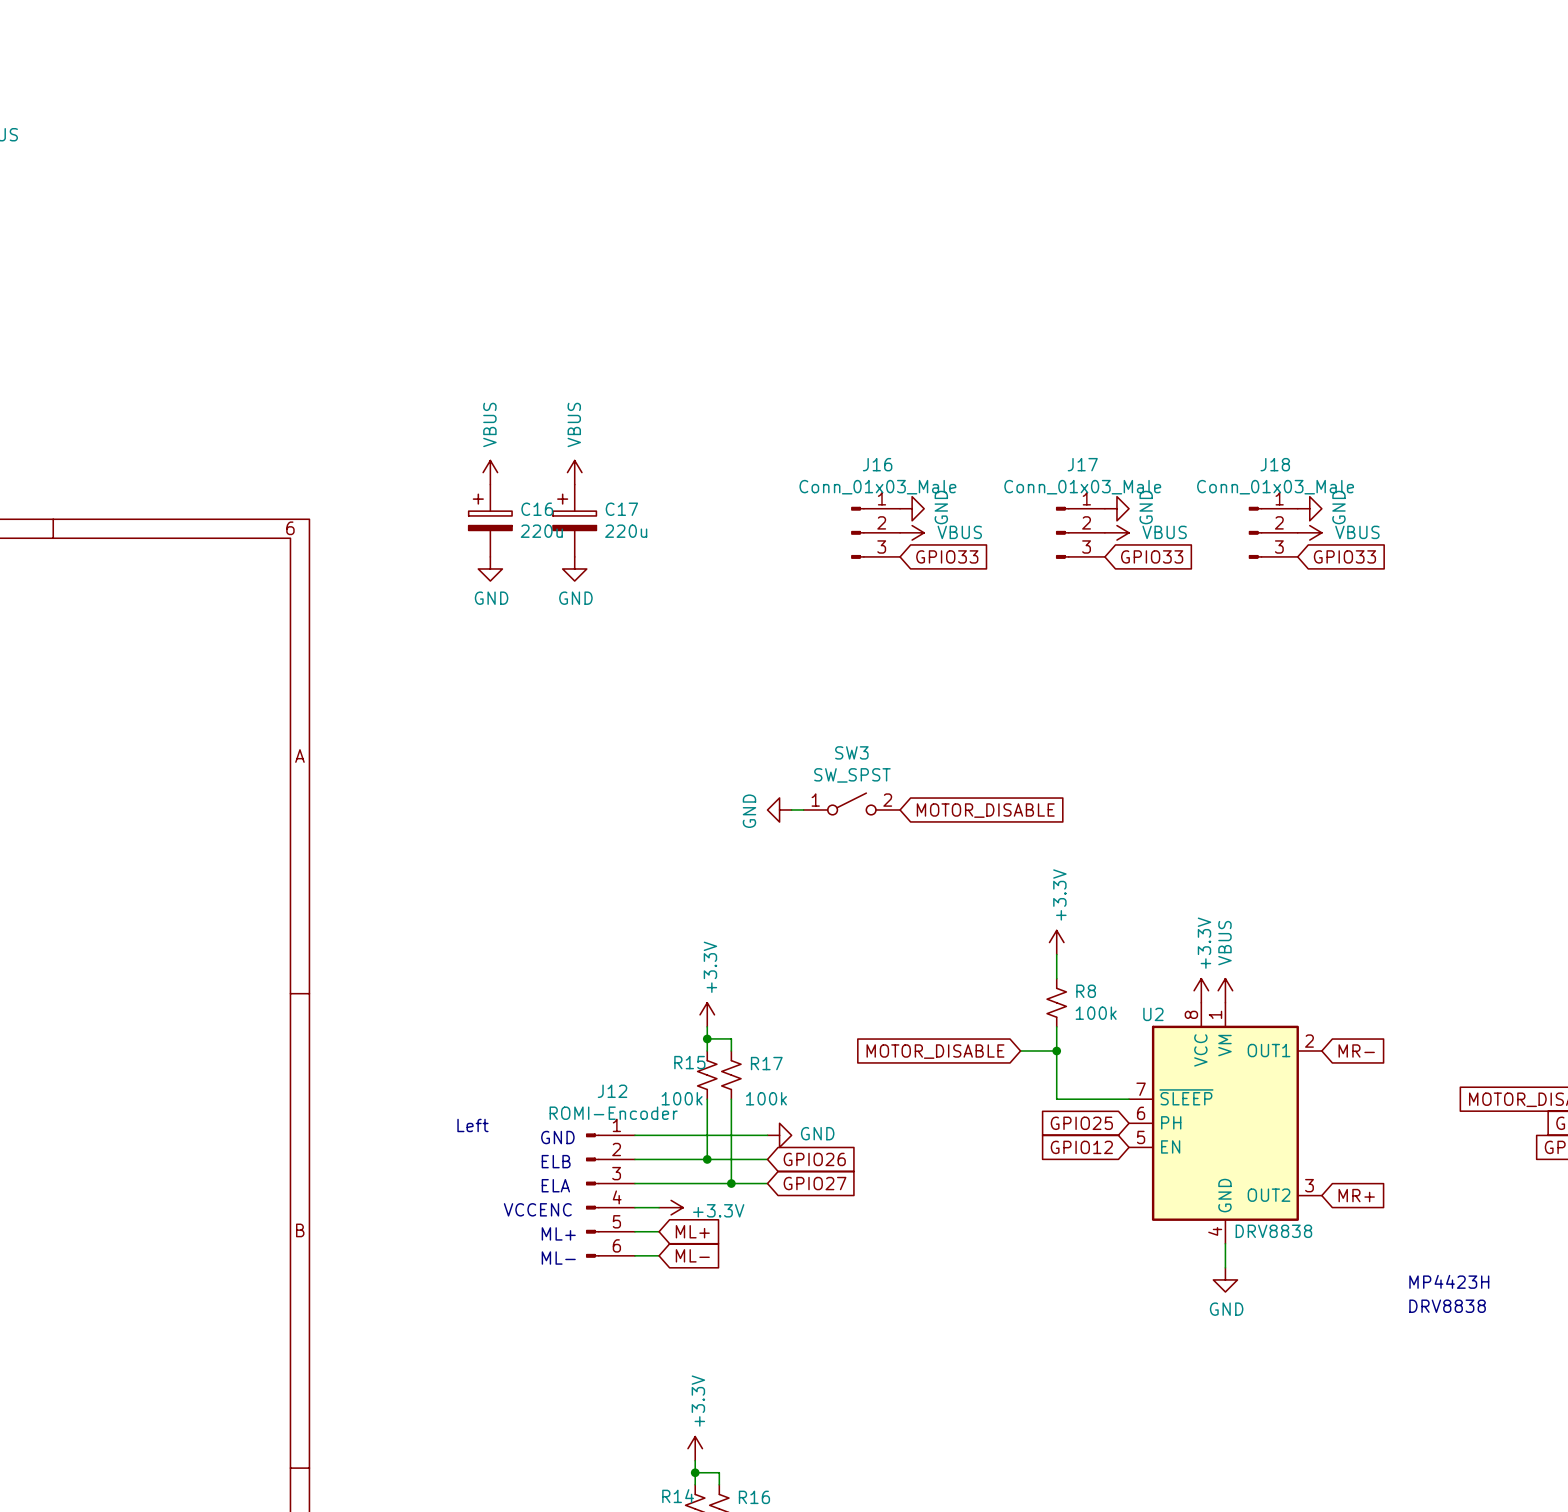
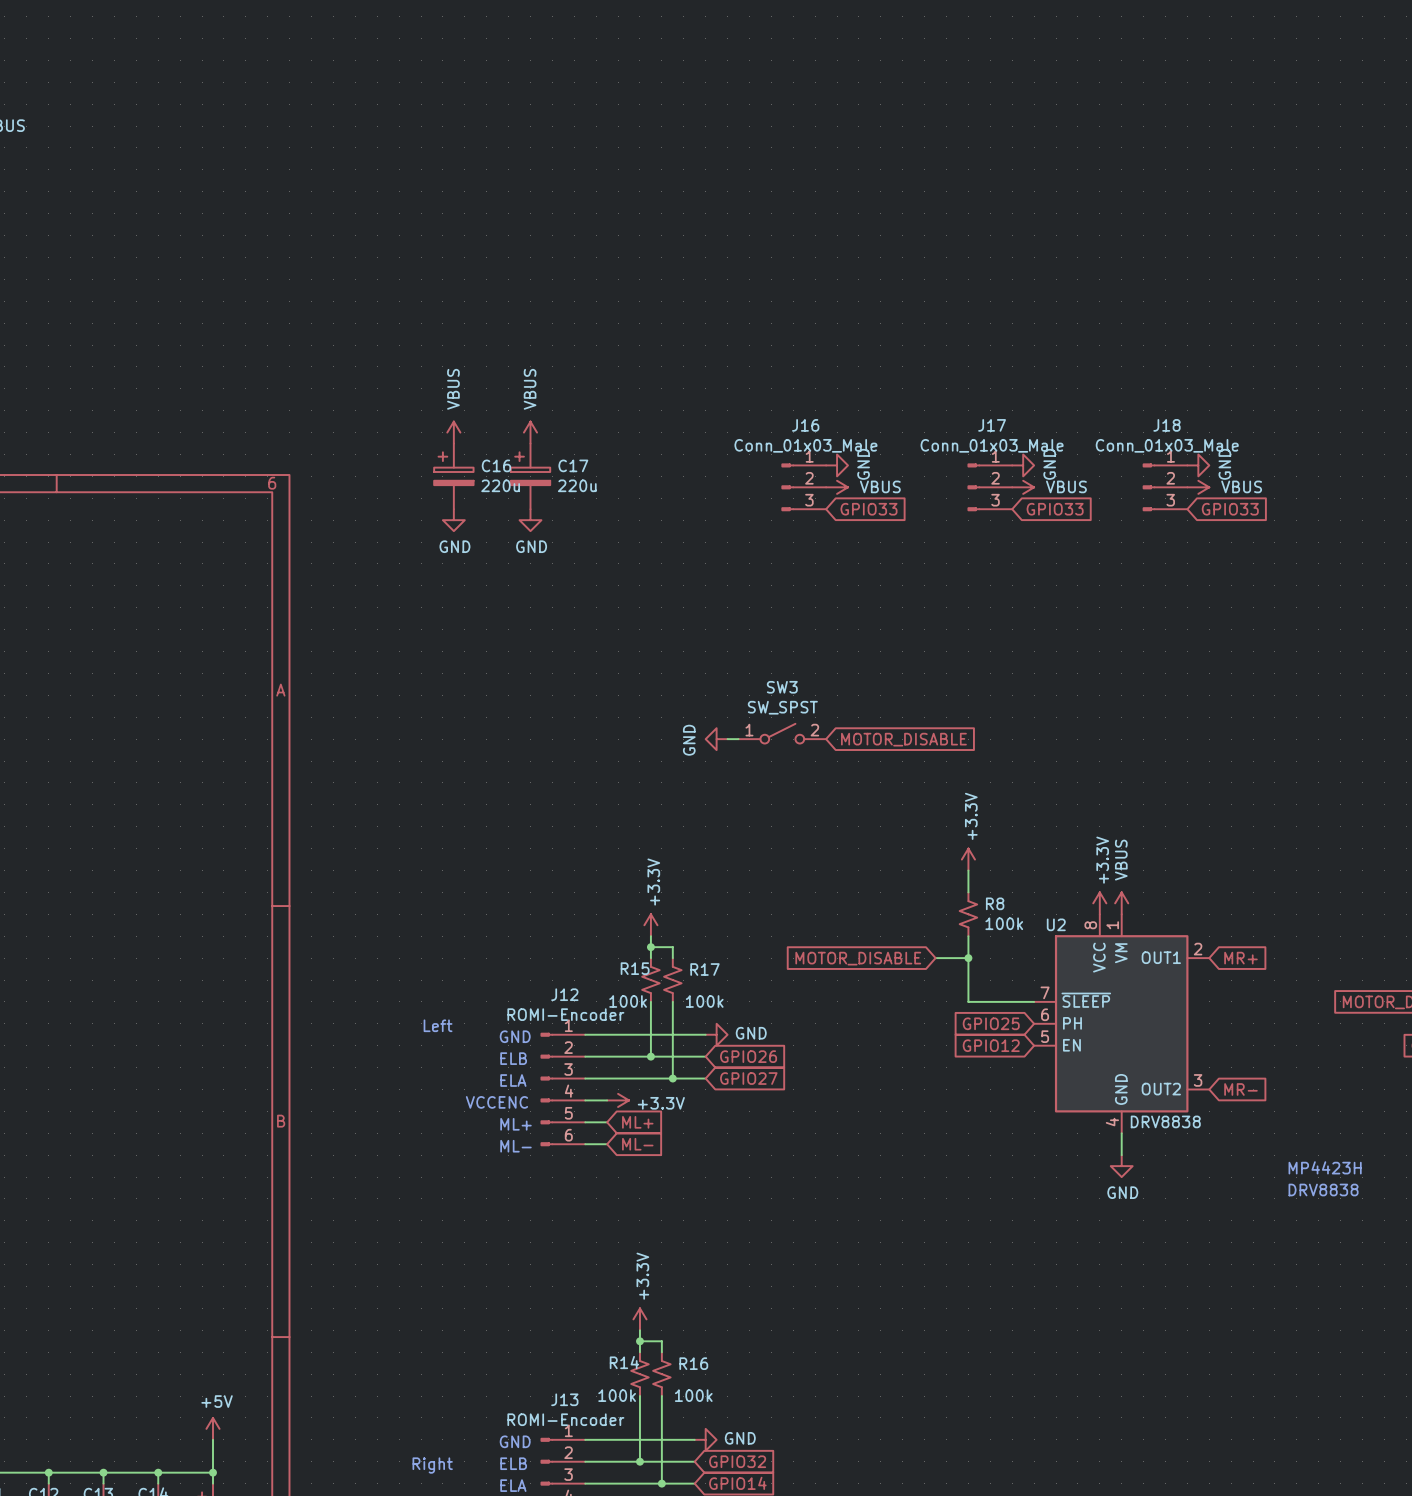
global label: MR- (1356, 1050) -> MR+ (1240, 958)
global label: MR+ (1356, 1195) -> MR- (1240, 1089)

